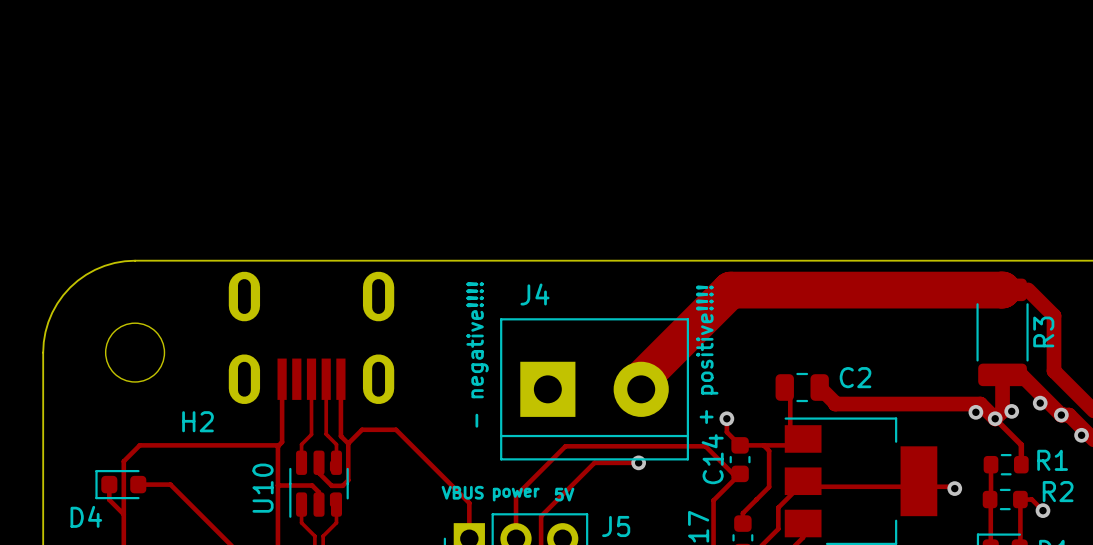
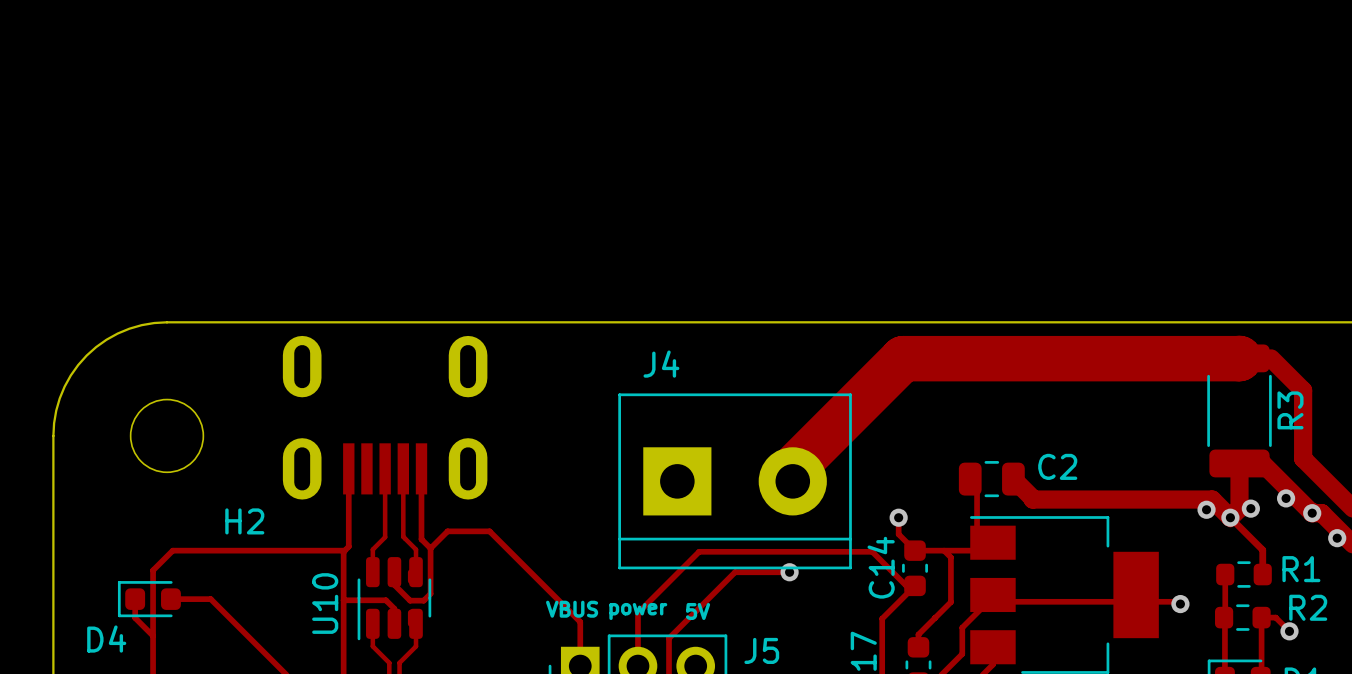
text: - negative!!!! (477, 354) -> none
text: + positive!!!! (707, 354) -> none

